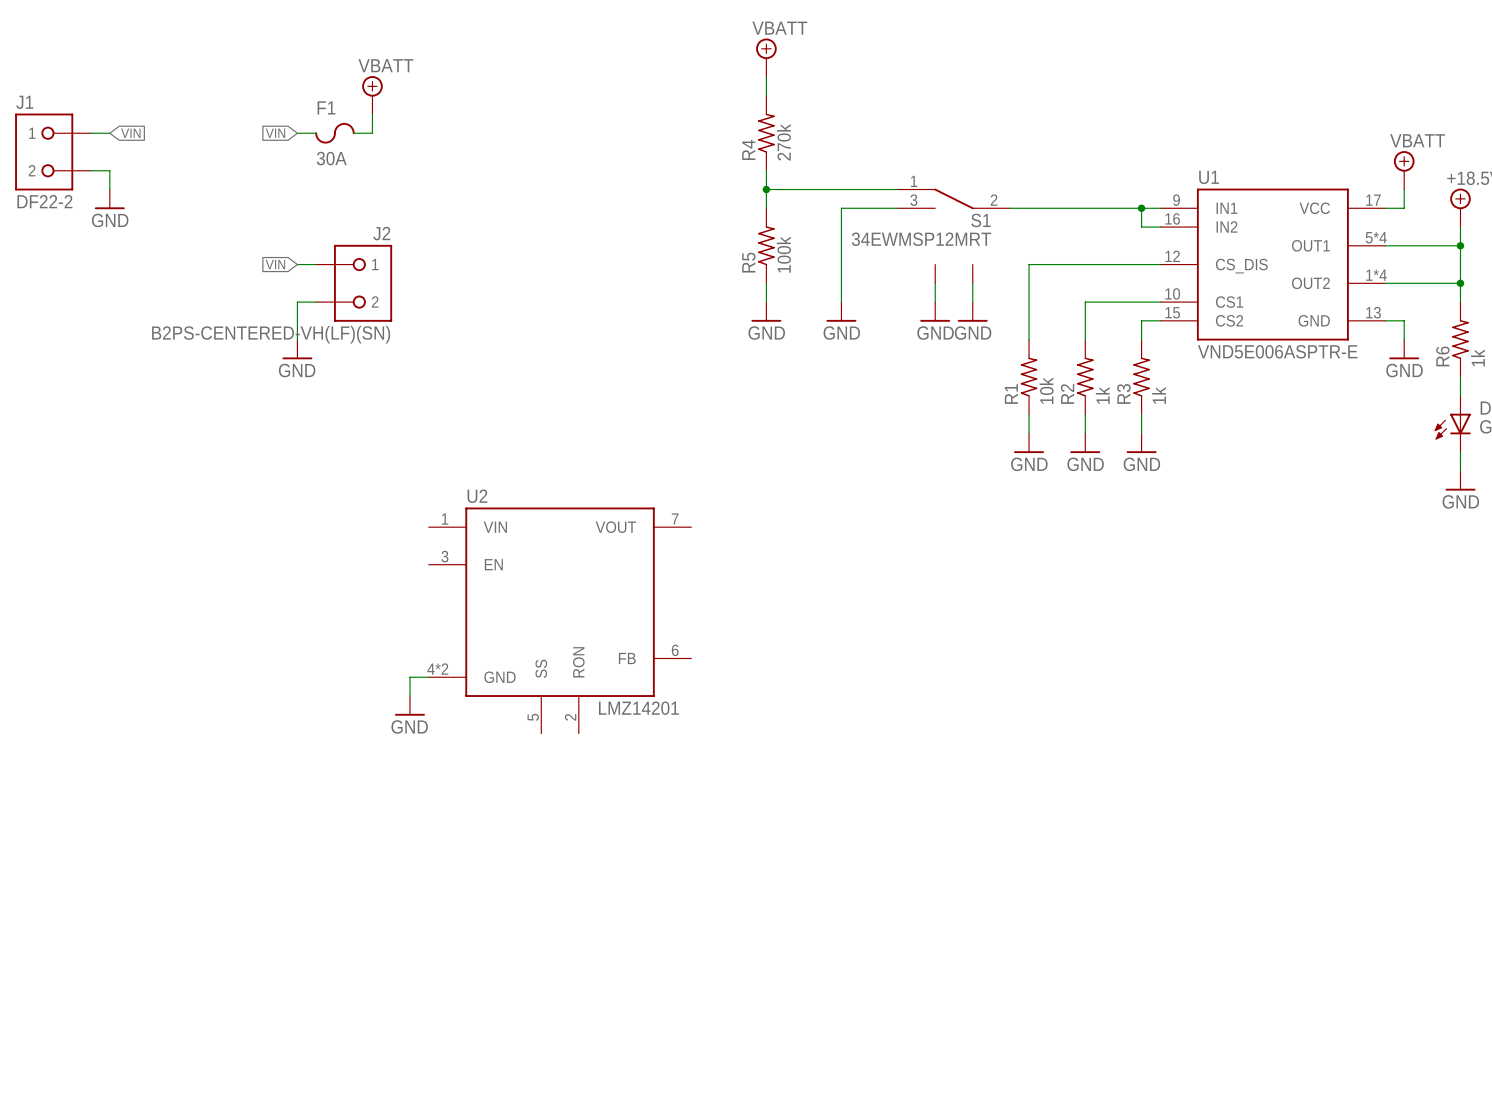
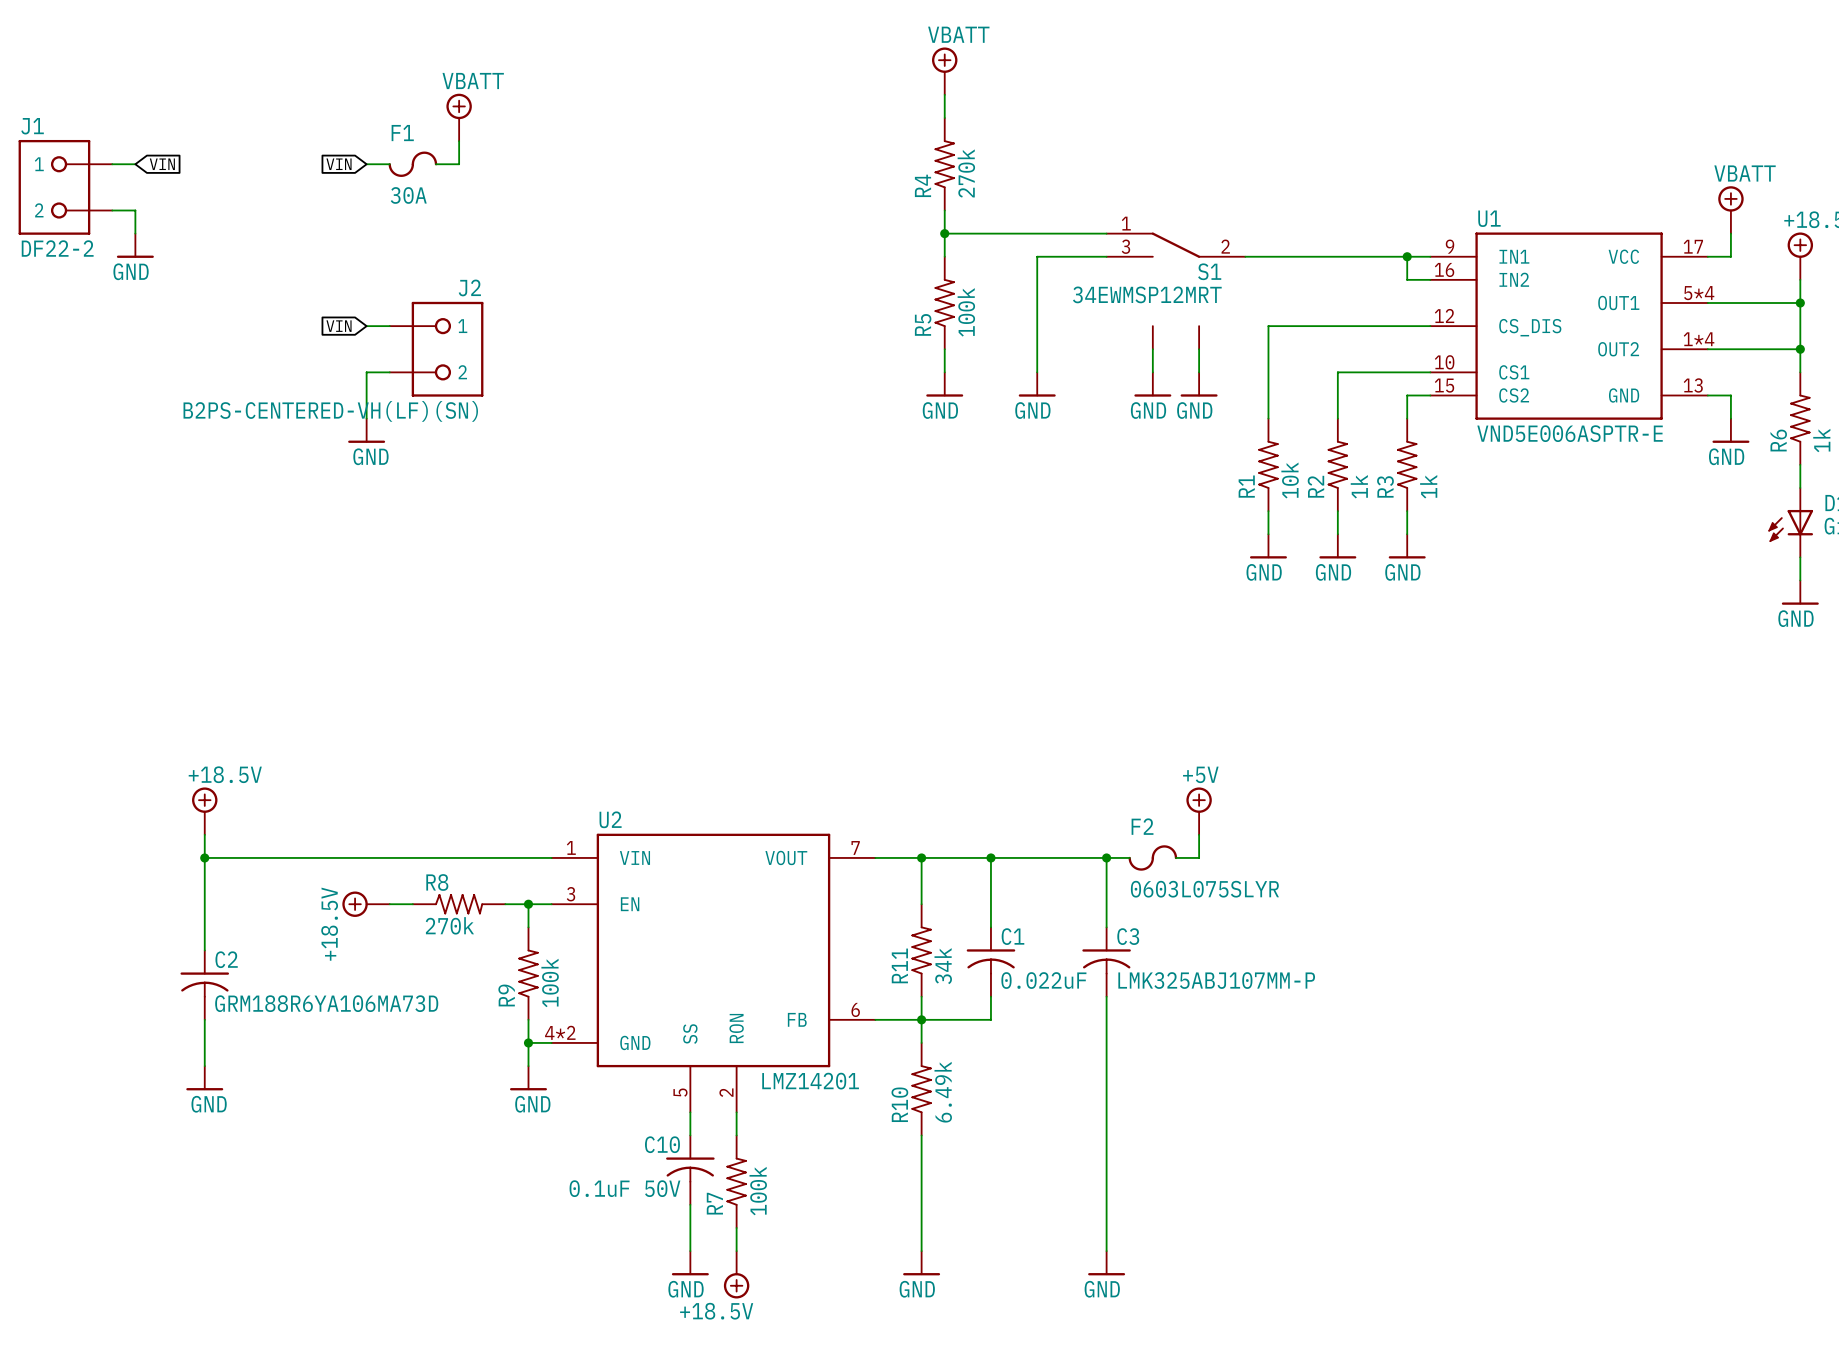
U2 position: (560, 620) -> (713, 973)
power symbol: none -> +18.5V (204, 811)
power symbol: none -> +5V (1199, 811)
wire: none -> (204, 834) (204, 950)
wire: (428, 677) (409, 677) (409, 696) -> none
wire: none -> (1199, 834) (1199, 857) (1175, 857)
wire: none -> (204, 857) (551, 857)
junction: none -> (204, 857)
wire: none -> (875, 857) (1129, 857)
wire: none -> (921, 857) (921, 904)
junction: none -> (921, 857)
wire: none -> (990, 857) (990, 927)
junction: none -> (990, 857)
wire: none -> (1106, 857) (1106, 927)
junction: none -> (1106, 857)
F2: none -> 0603L075SLYR (1152, 857)
power symbol: GND (409, 705) -> none
power symbol: none -> +18.5V (366, 904)
wire: none -> (389, 904) (412, 904)
R8: none -> 270k (459, 904)
wire: none -> (505, 904) (551, 904)
wire: none -> (528, 904) (528, 927)
junction: none -> (528, 904)
R11: none -> 34k (921, 950)
C1: none -> 0.022uF (990, 962)
C3: none -> LMK325ABJ107MM-P (1106, 962)
R9: none -> 100k (528, 973)
C2: none -> GRM188R6YA106MA73D (204, 985)
wire: none -> (921, 996) (921, 1042)
wire: none -> (990, 996) (990, 1019) (875, 1019)
wire: none -> (1106, 996) (1106, 1251)
wire: none -> (204, 1019) (204, 1066)
wire: none -> (528, 1019) (528, 1066)
junction: none -> (921, 1019)
wire: none -> (528, 1042) (551, 1042)
junction: none -> (528, 1042)
power symbol: none -> GND (204, 1078)
power symbol: none -> GND (528, 1078)
R10: none -> 6.49k (921, 1089)
wire: none -> (690, 1112) (690, 1135)
wire: none -> (736, 1112) (736, 1135)
wire: none -> (921, 1135) (921, 1251)
C10: none -> 0.1uF 50V (690, 1170)
R7: none -> 100k (736, 1181)
wire: none -> (690, 1204) (690, 1251)
wire: none -> (736, 1227) (736, 1251)
power symbol: none -> GND (690, 1263)
power symbol: none -> GND (921, 1263)
power symbol: none -> GND (1106, 1263)
power symbol: none -> +18.5V (736, 1274)

